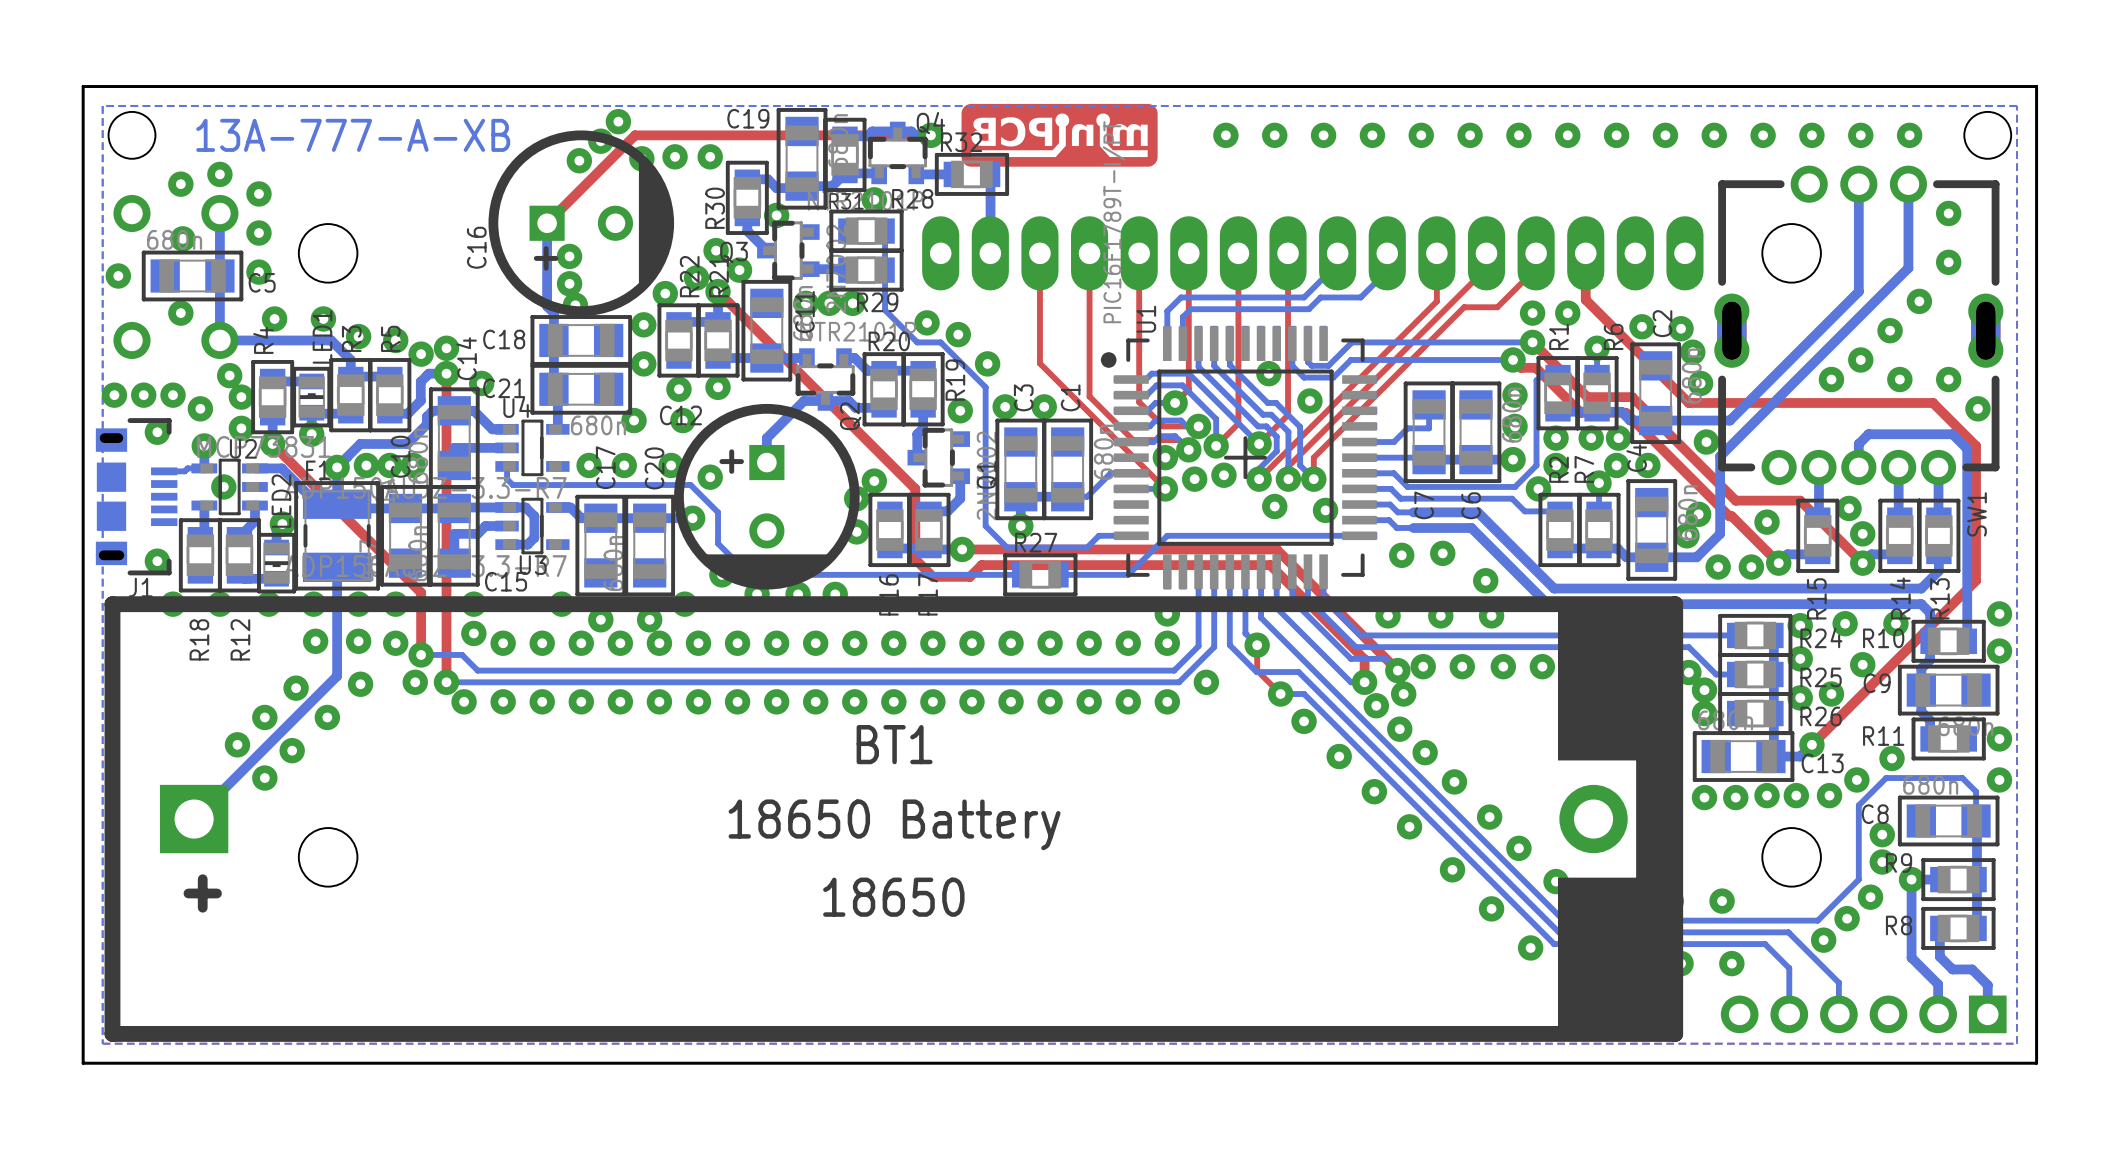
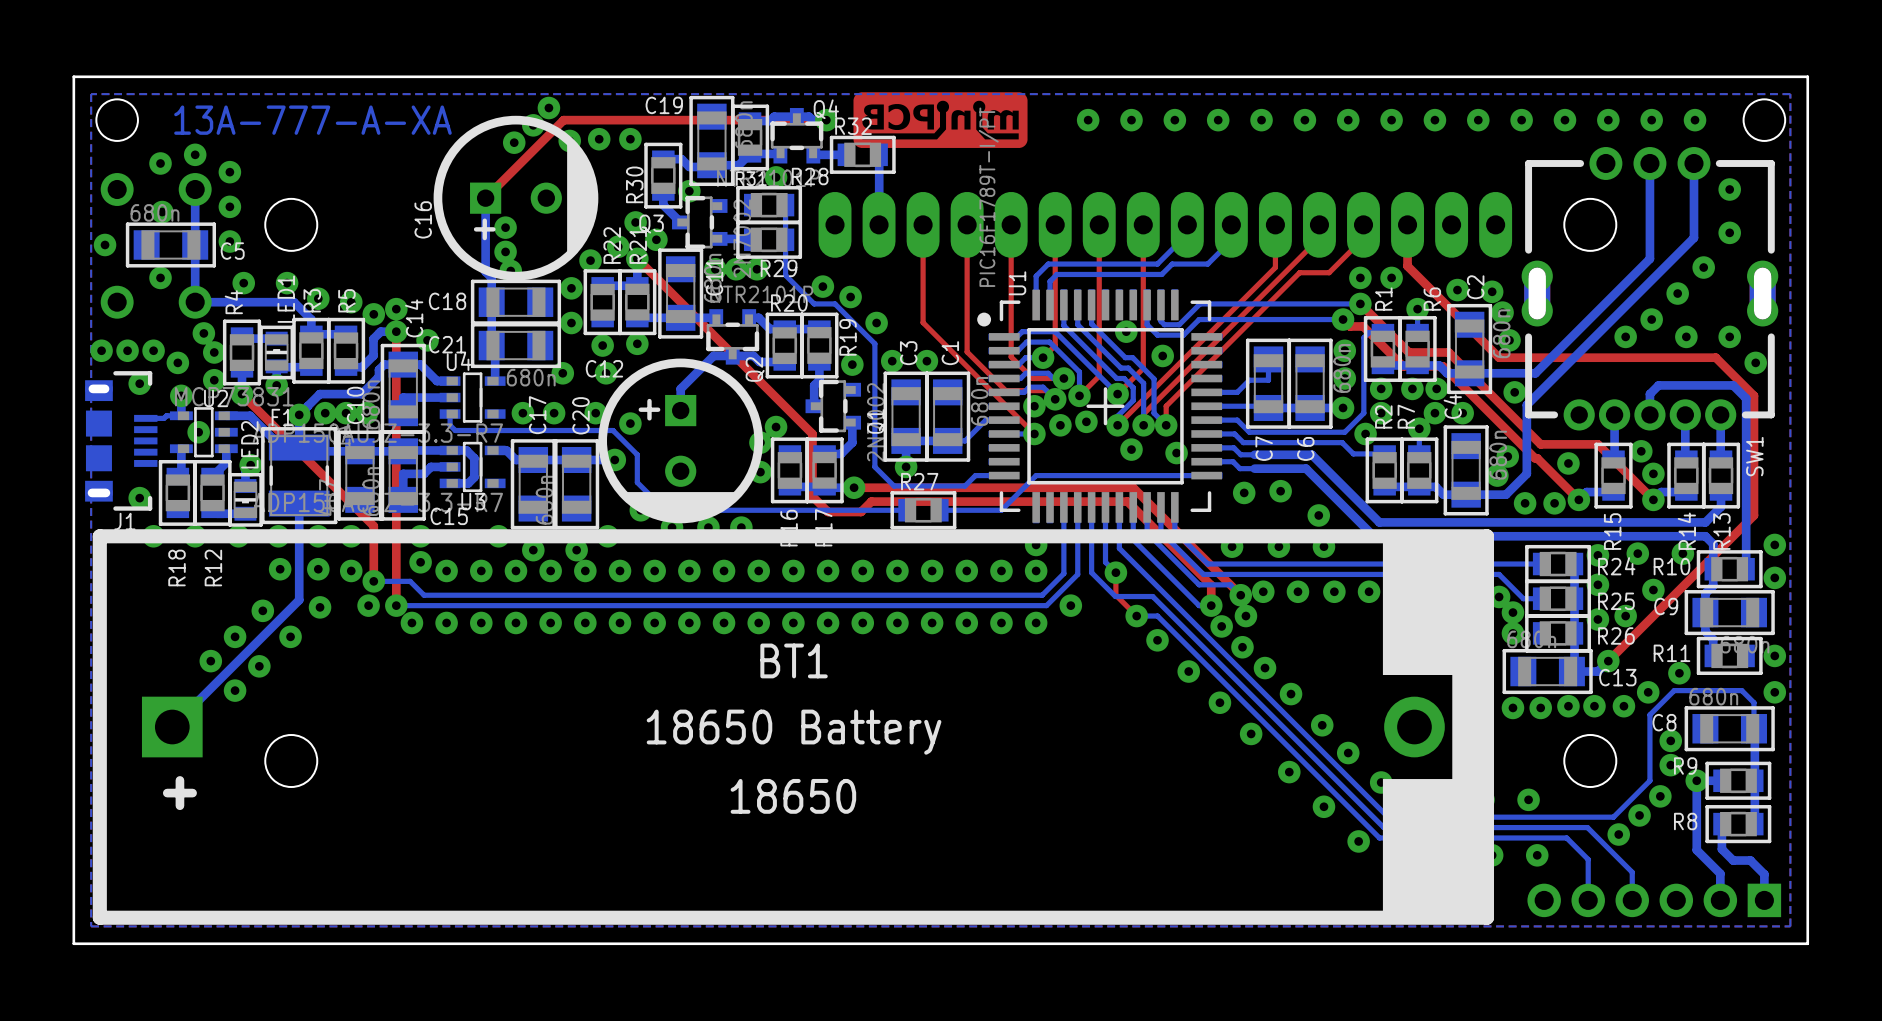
part text: 13A-777-A-XB (353, 135) -> 13A-777-A-XA (312, 120)

